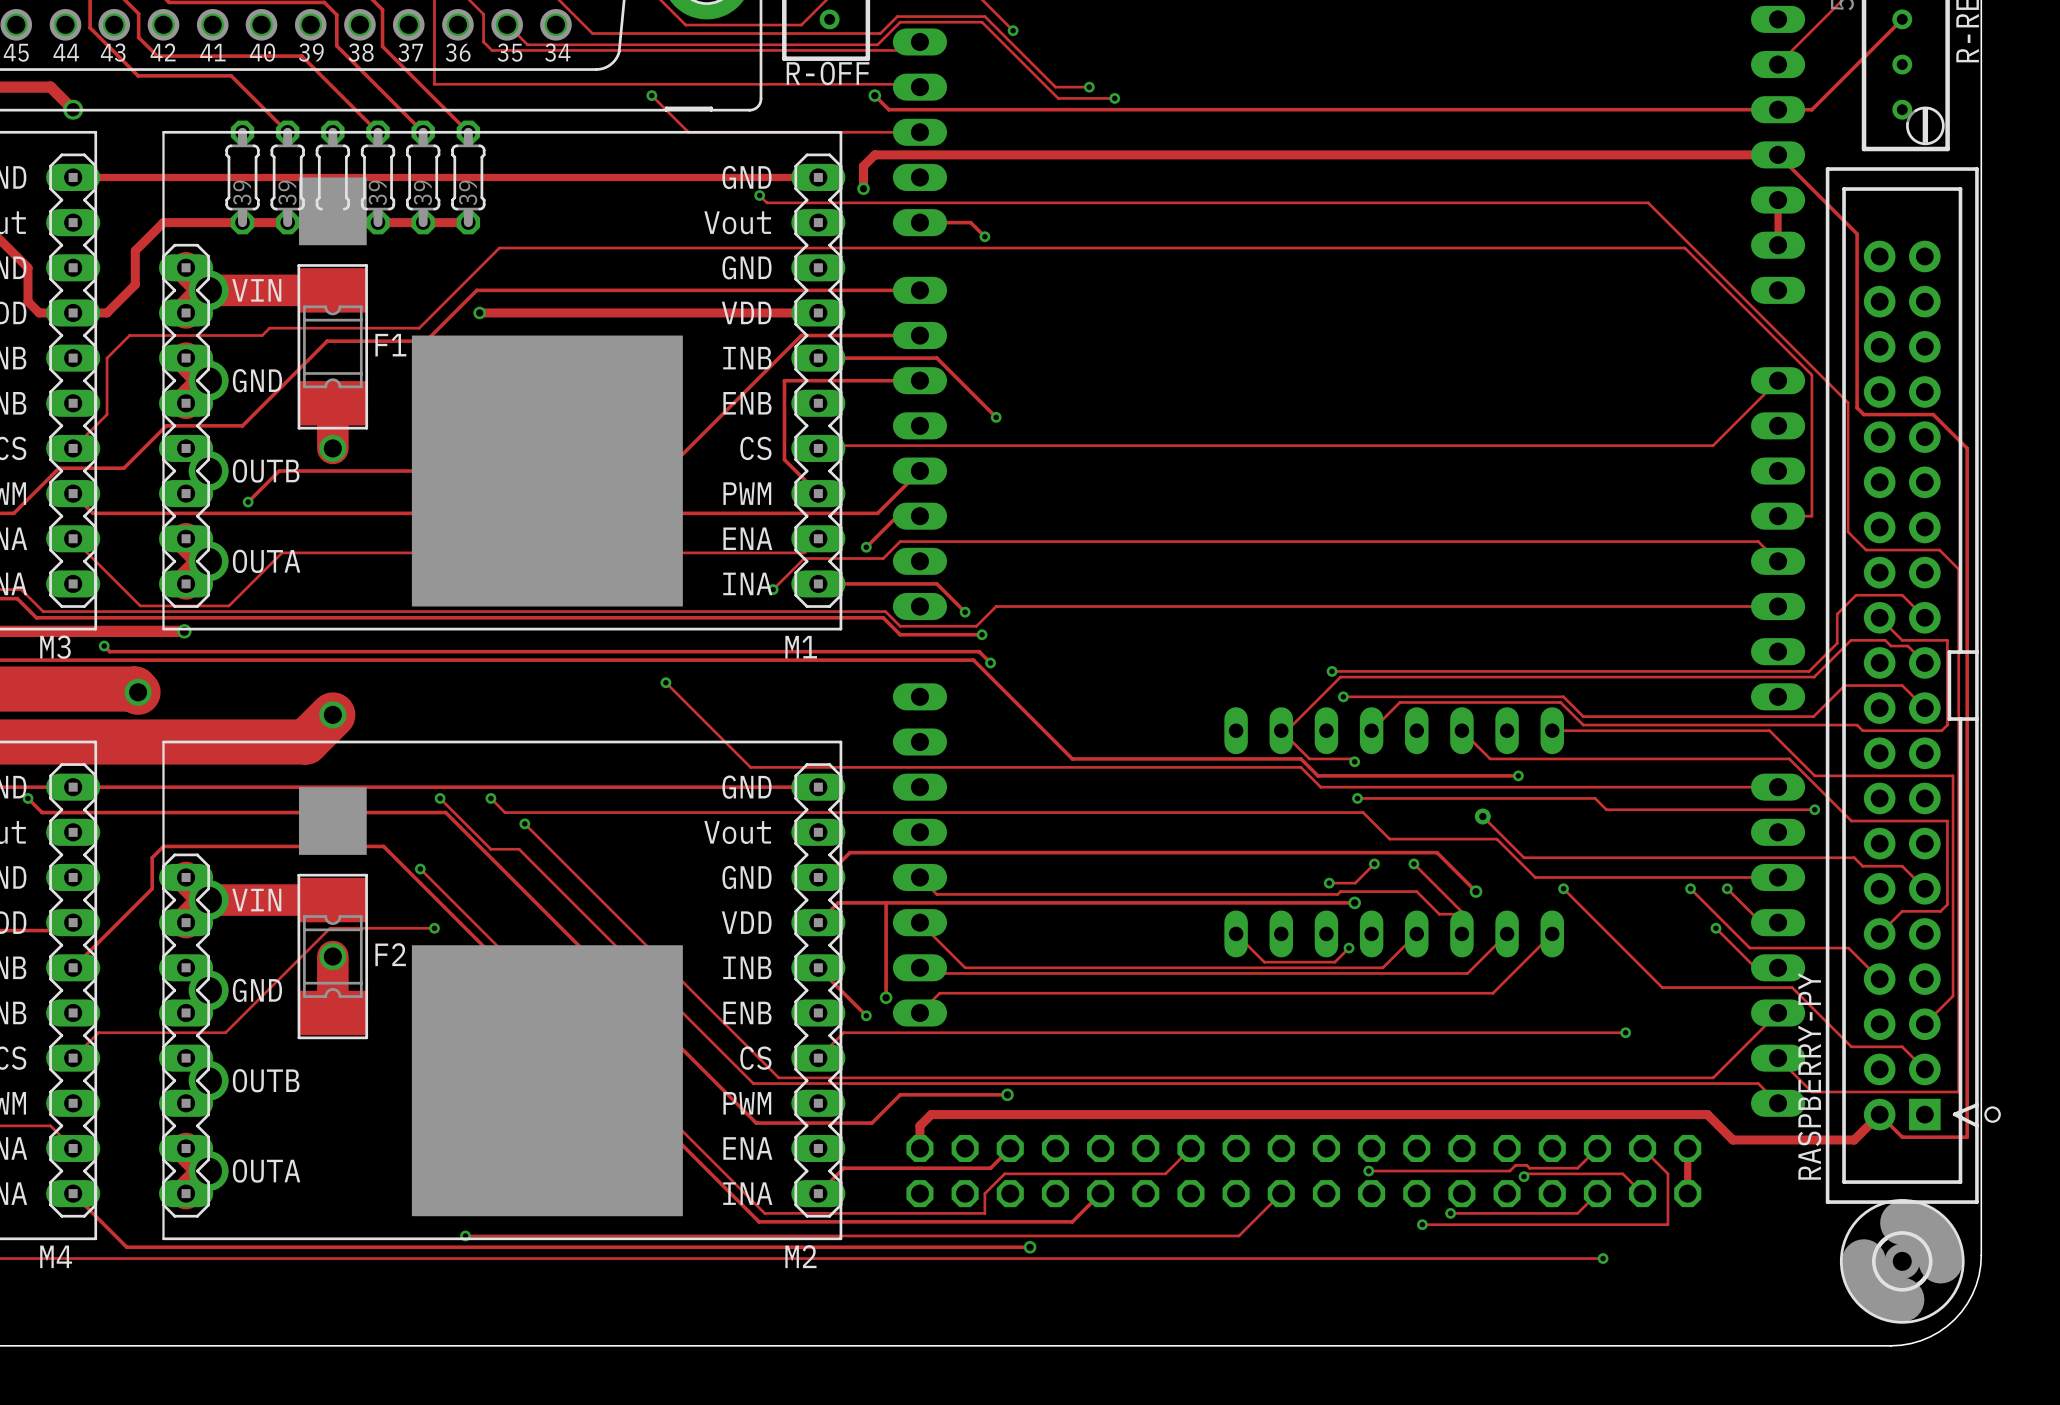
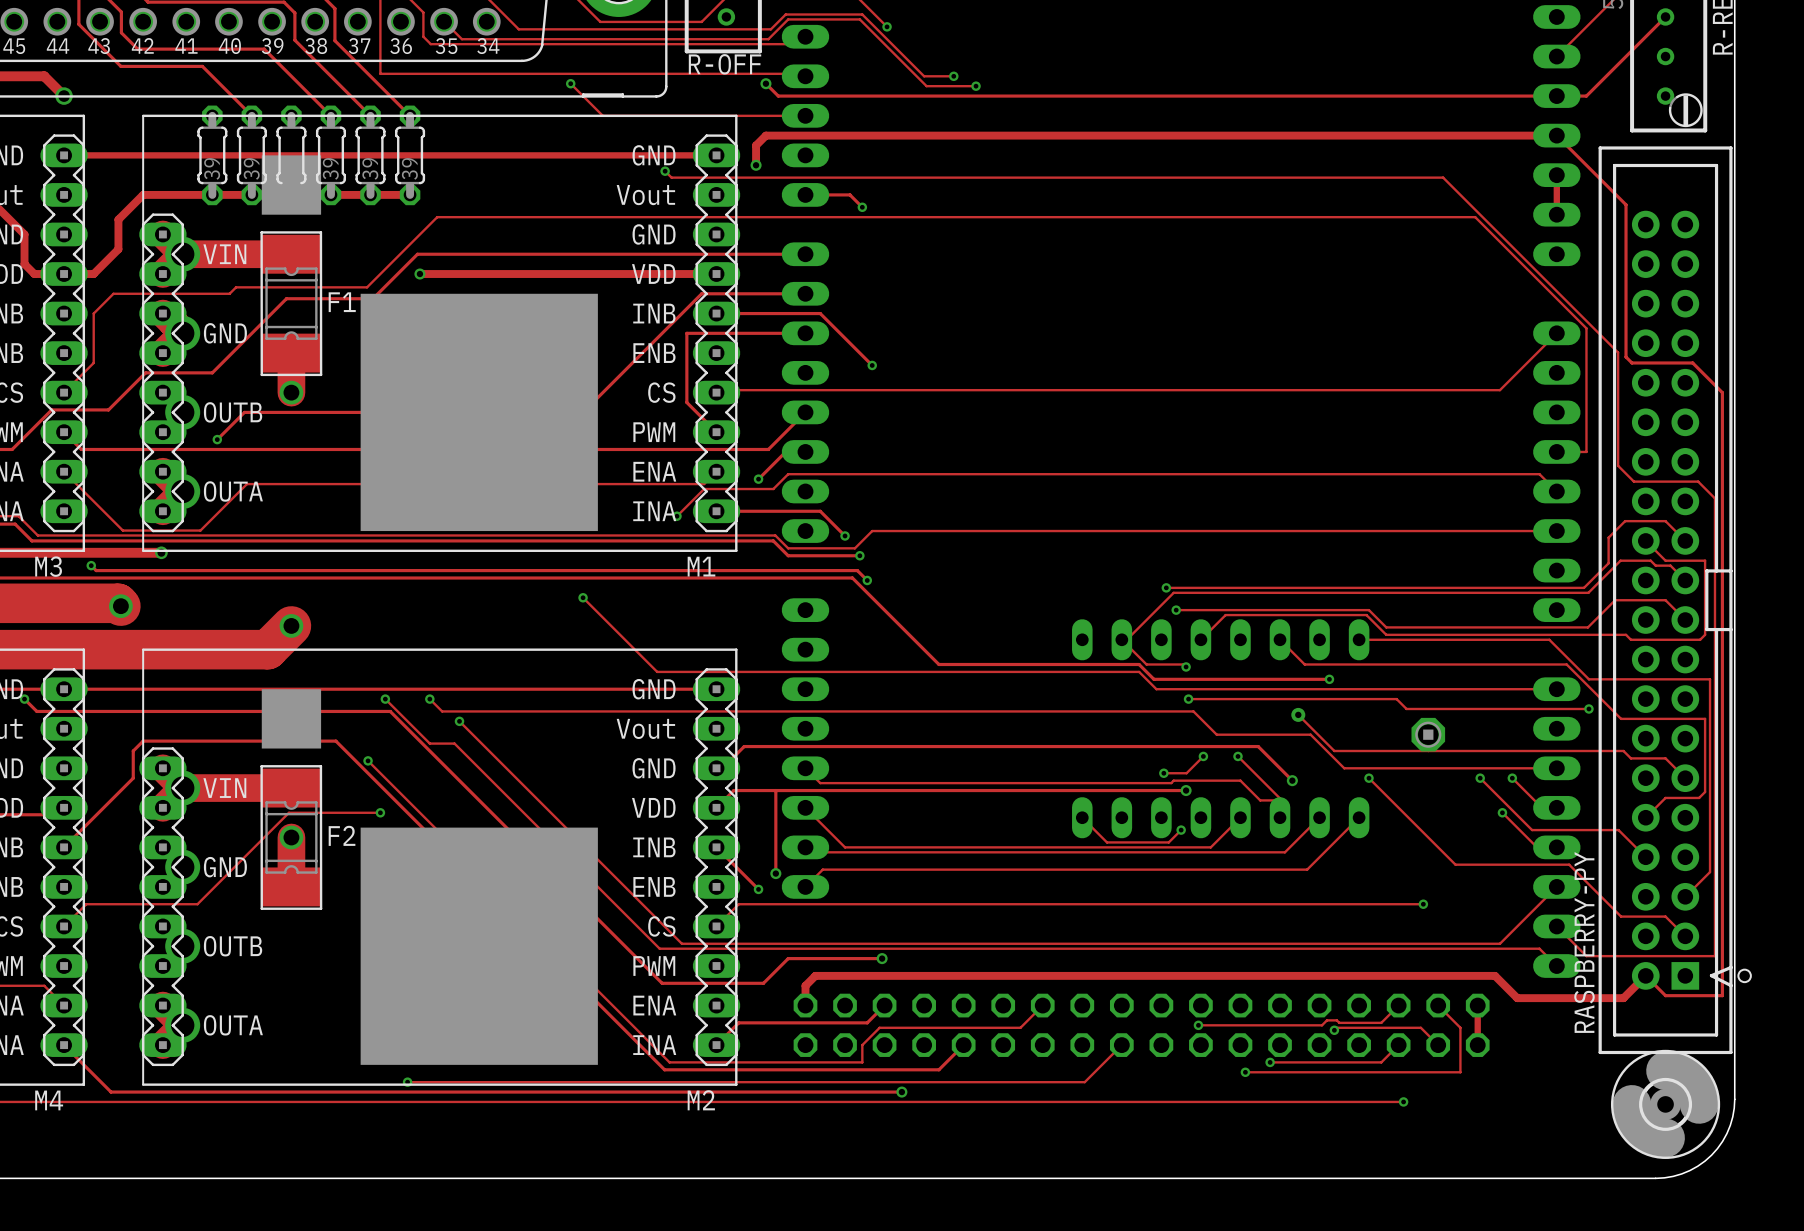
part: none -> (1428, 734)

